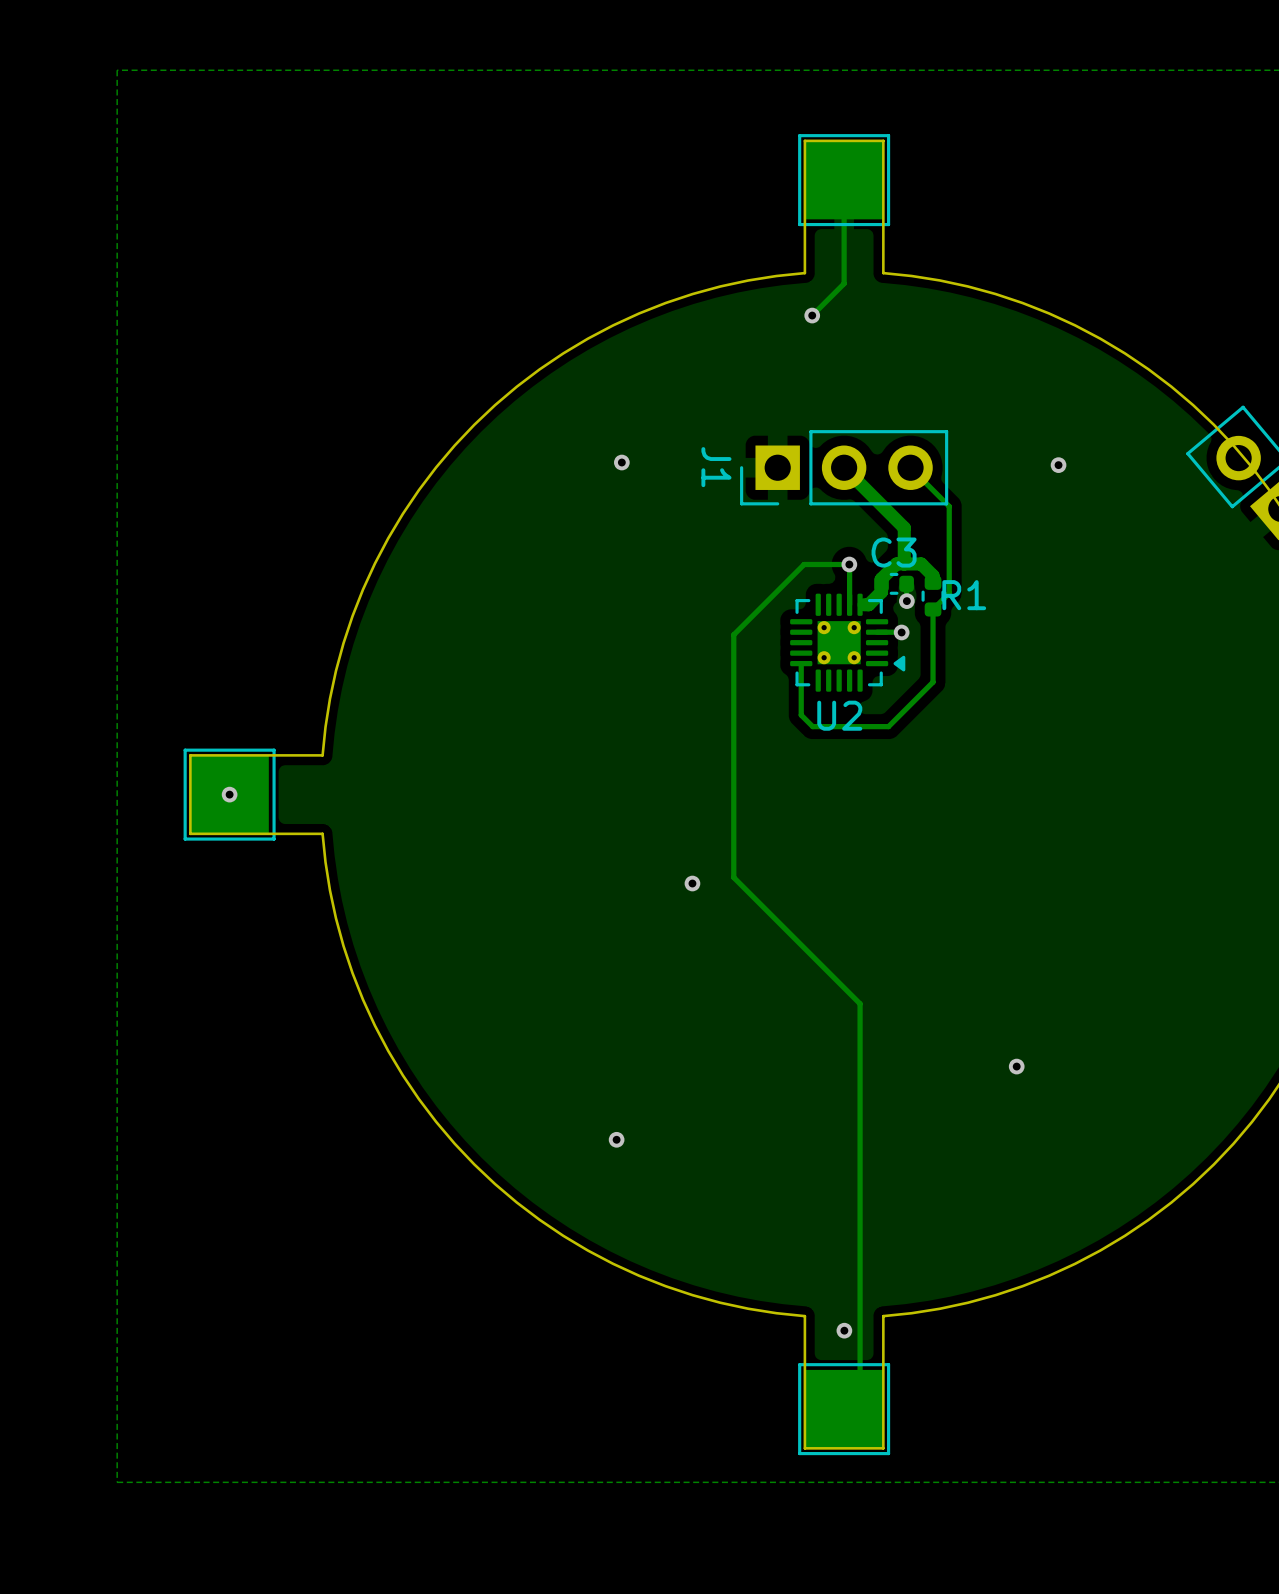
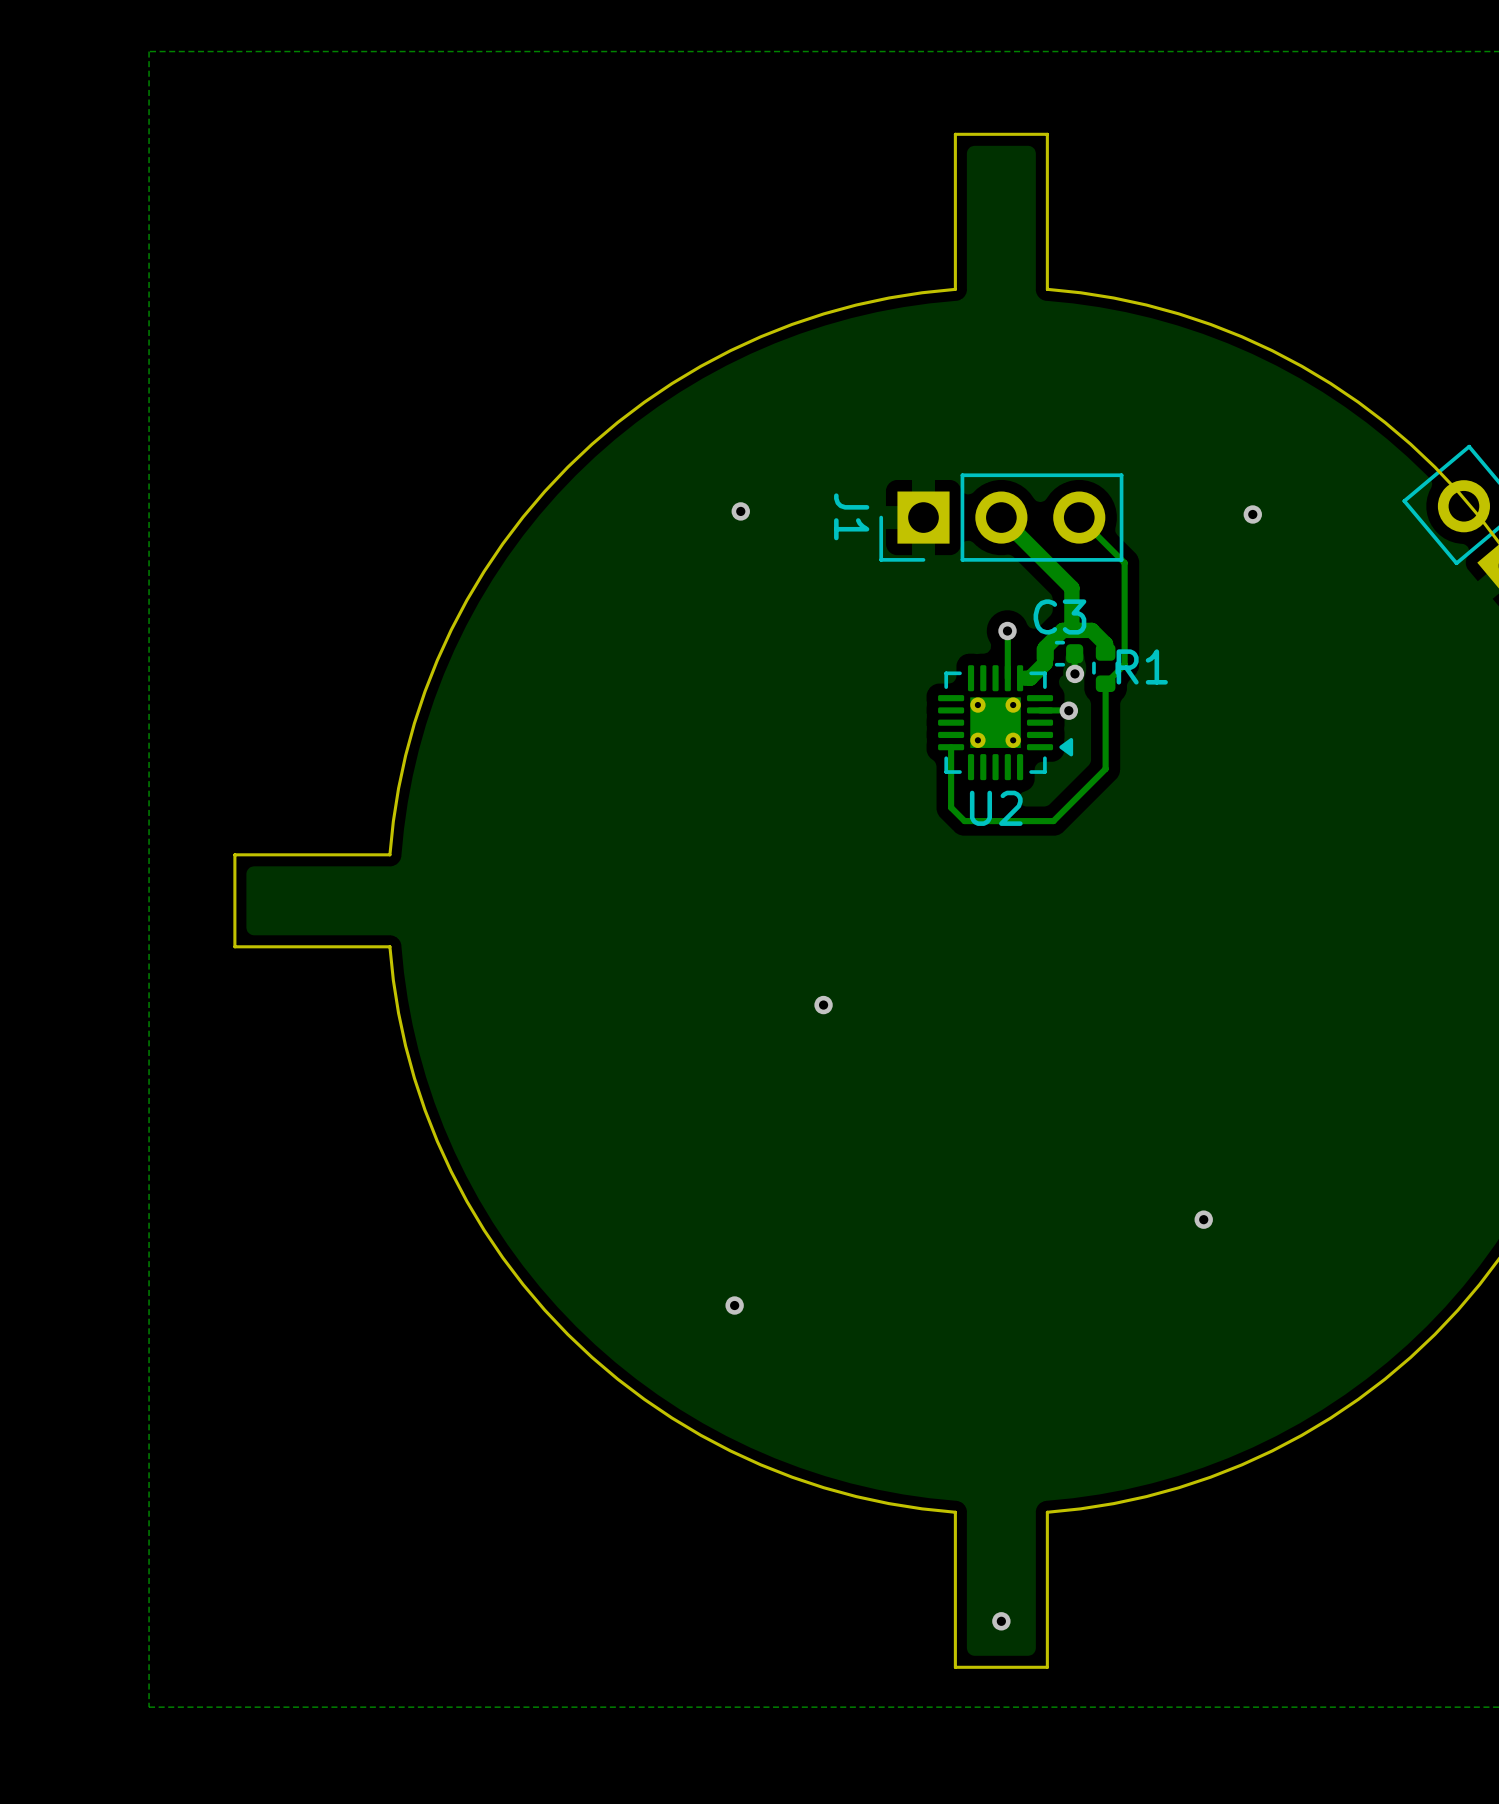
track: (844, 180) (844, 283) (812, 315) -> none
part: (844, 180) -> none
via: (812, 315) -> none
track: (849, 564) (804, 564) (733, 634) (733, 877) (860, 1003) (860, 1393) (844, 1409) -> none
part: (229, 794) -> none
via: (229, 794) -> none
via position: (844, 1330) -> (1001, 1621)
part: (844, 1409) -> none

